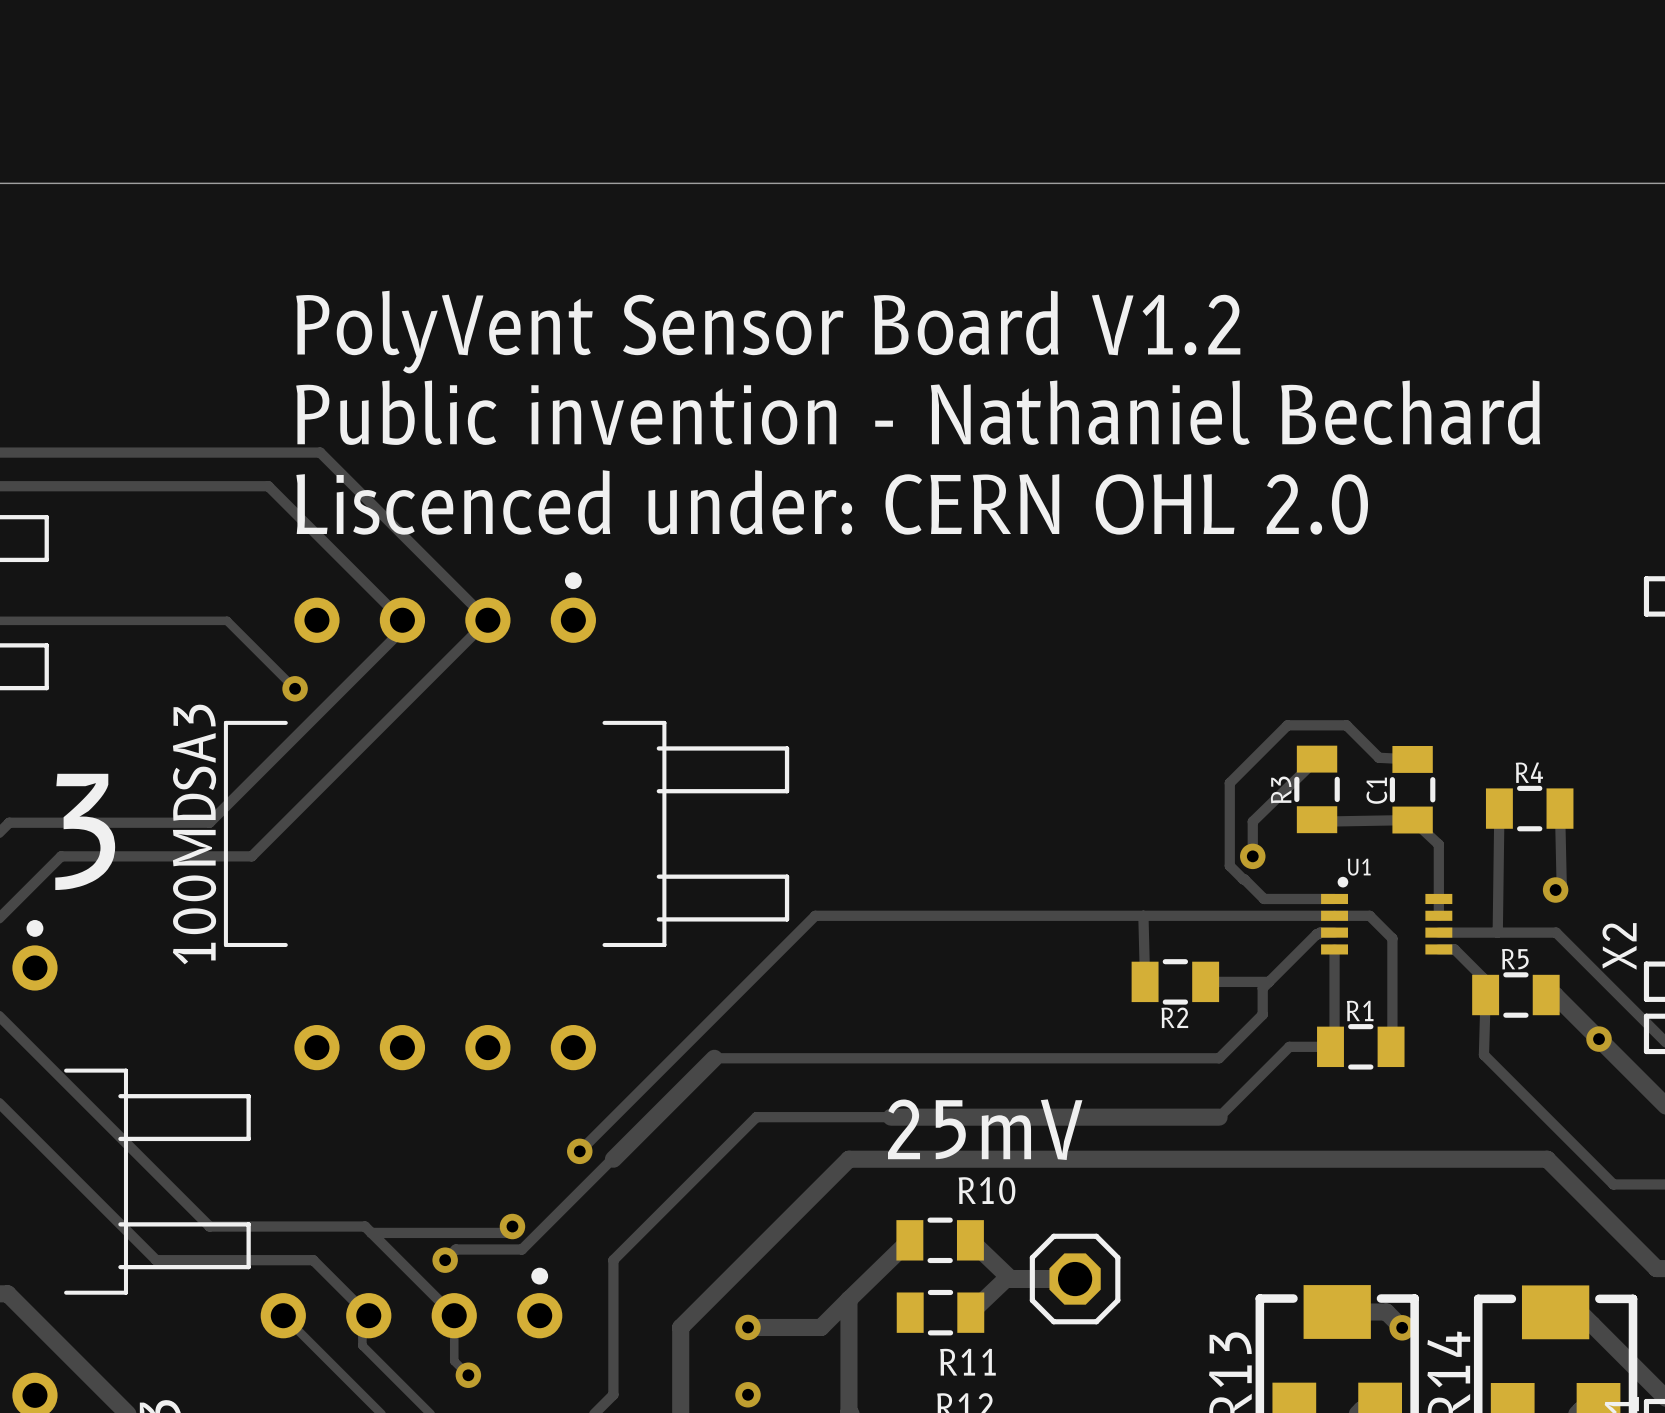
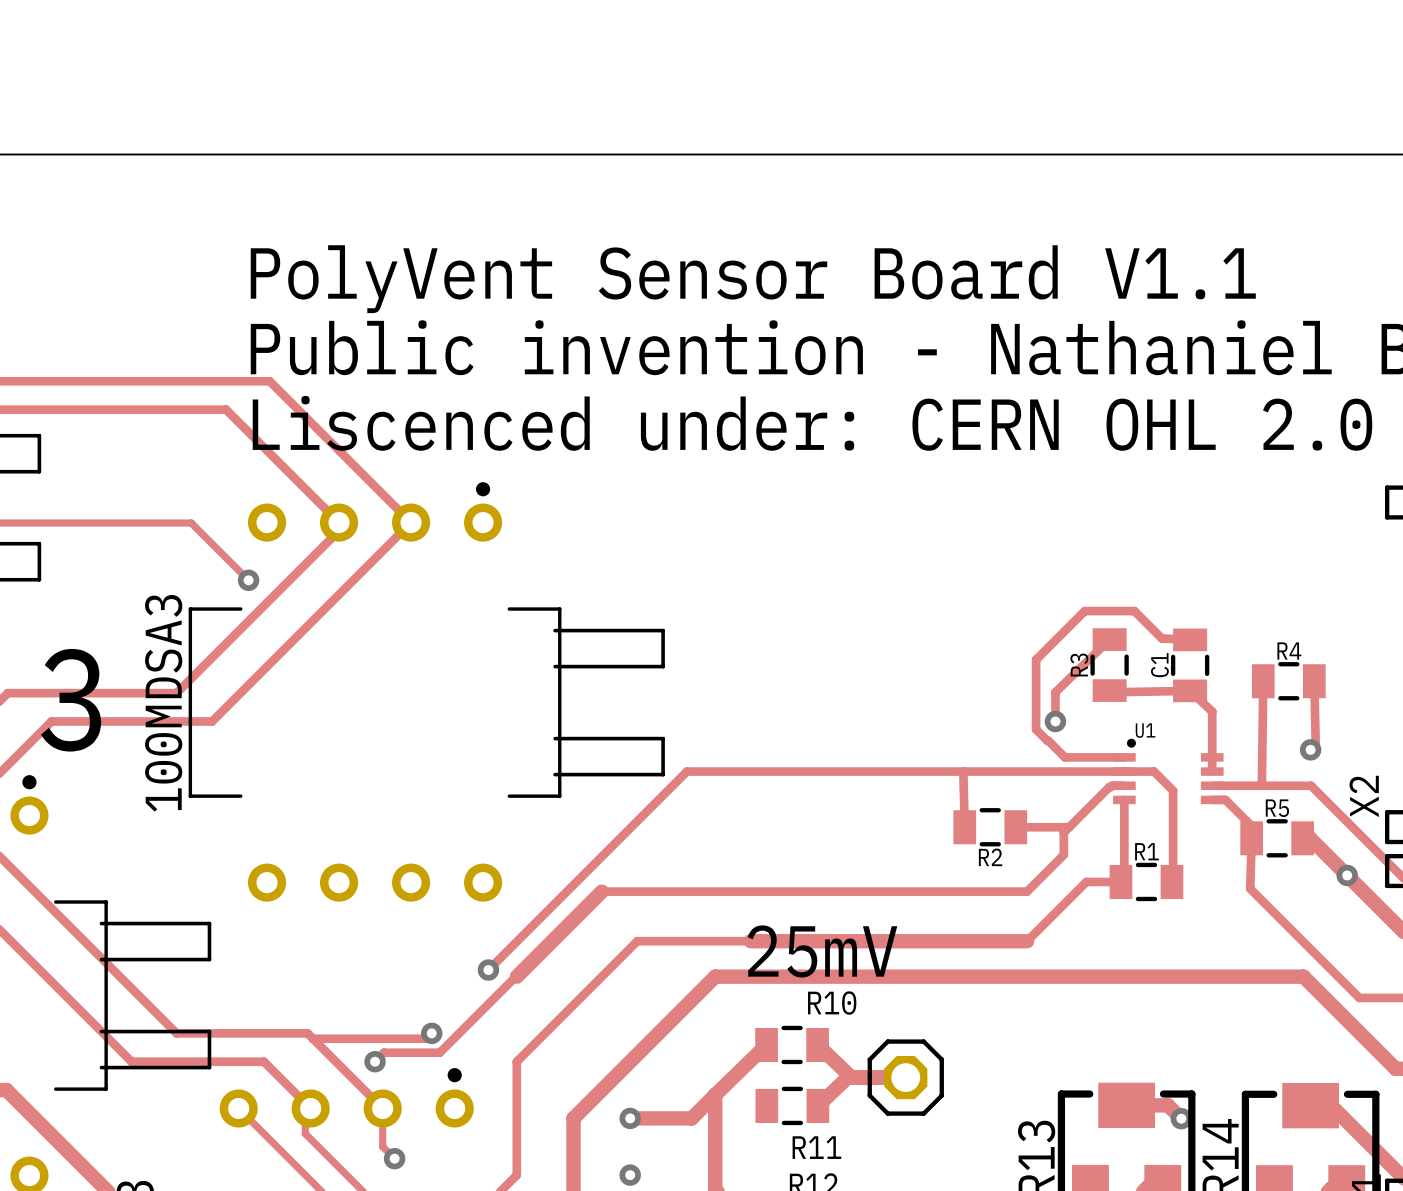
text: PolyVent Sensor Board V1.2 (768, 332) -> PolyVent Sensor Board V1.1 (753, 279)

